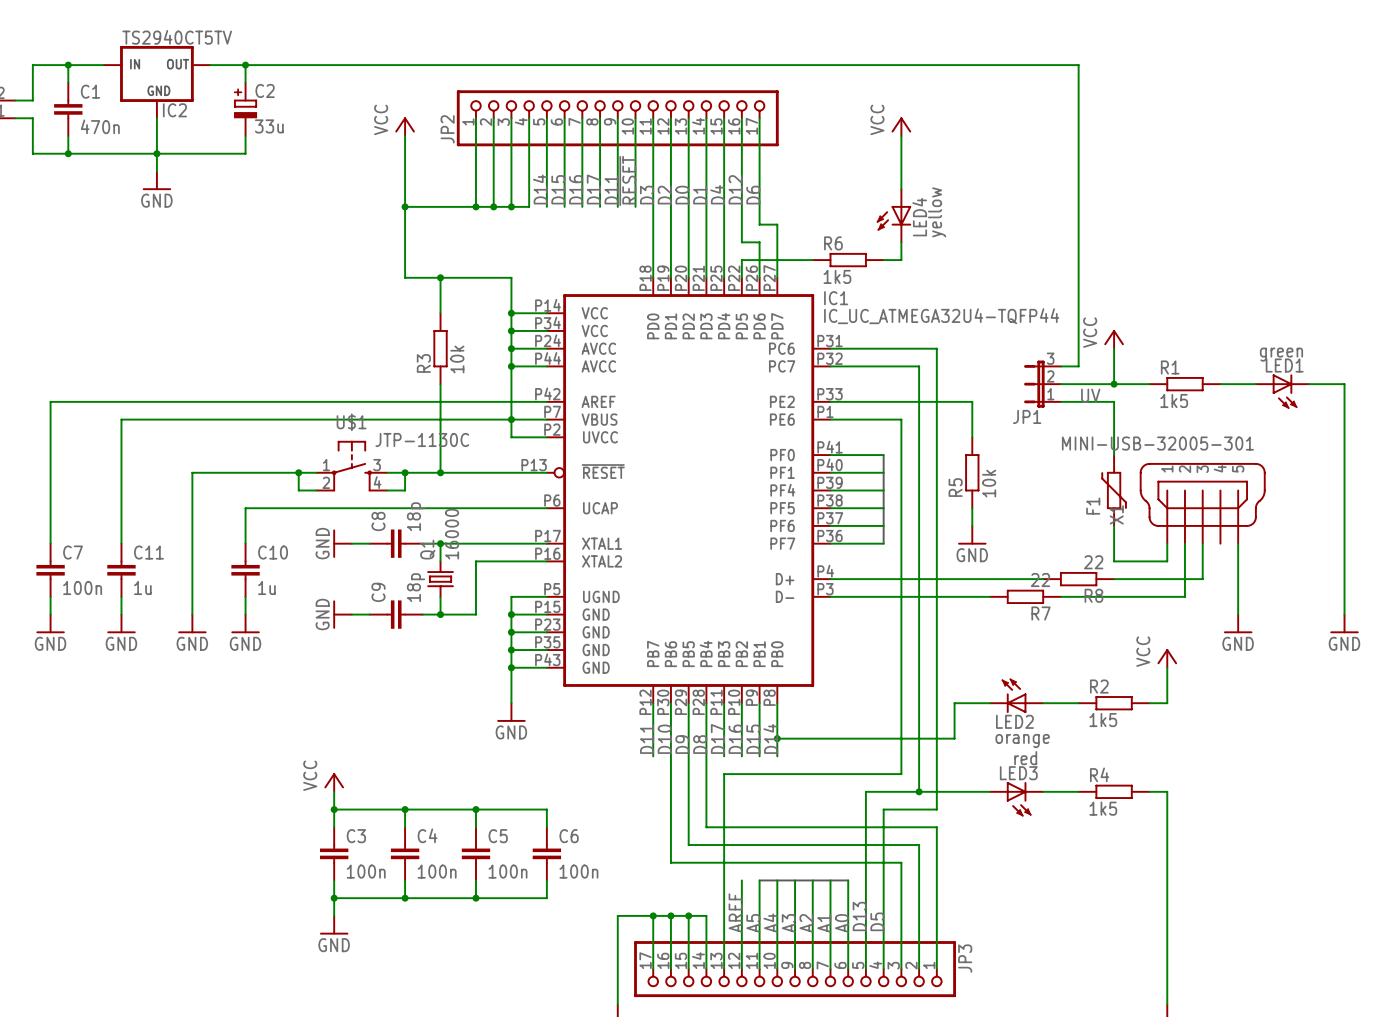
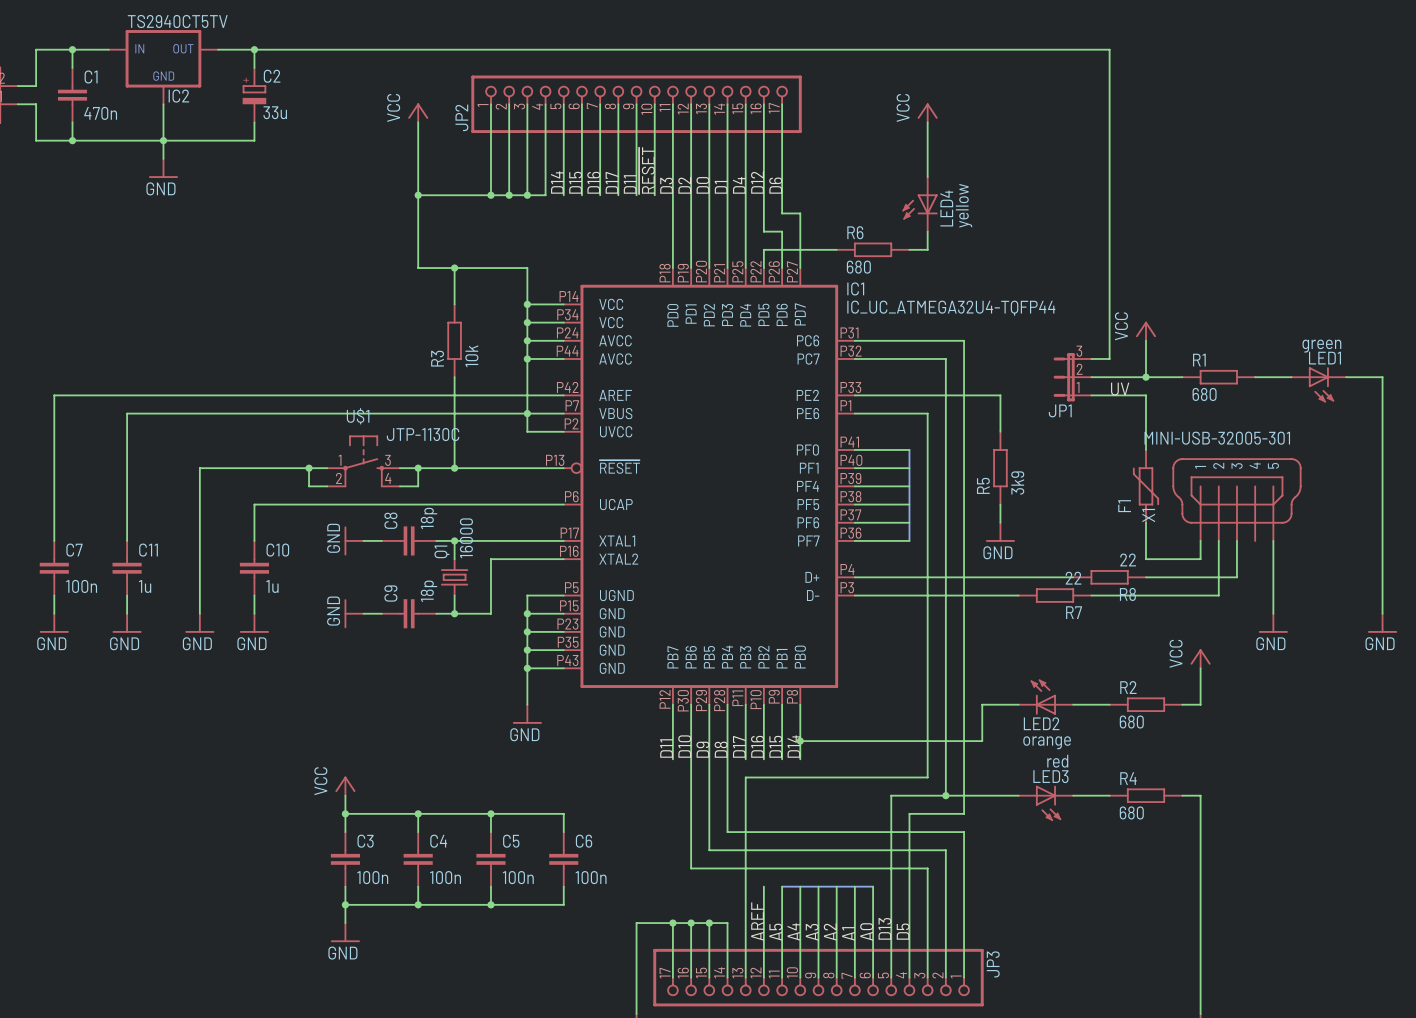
R6 value: 1k5 (837, 276) -> 680 (858, 267)
R1 value: 1k5 (1174, 400) -> 680 (1204, 394)
R5 value: 10k (989, 483) -> 3k9 (1017, 483)
R2 value: 1k5 (1103, 720) -> 680 (1131, 721)
R4 value: 1k5 (1103, 808) -> 680 (1131, 812)

